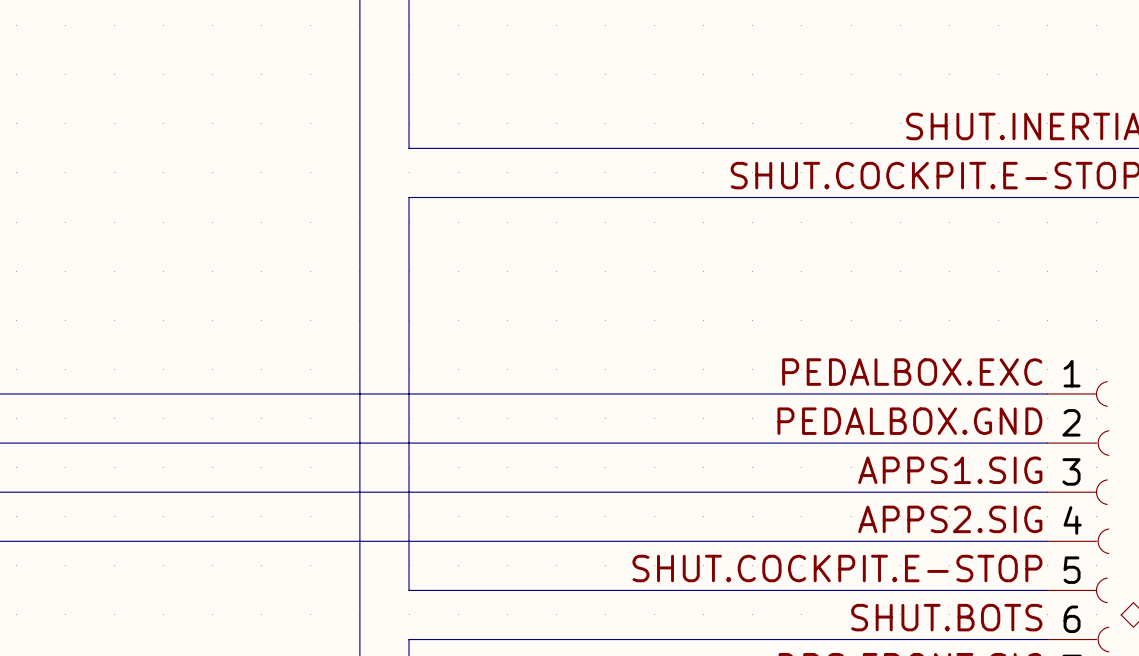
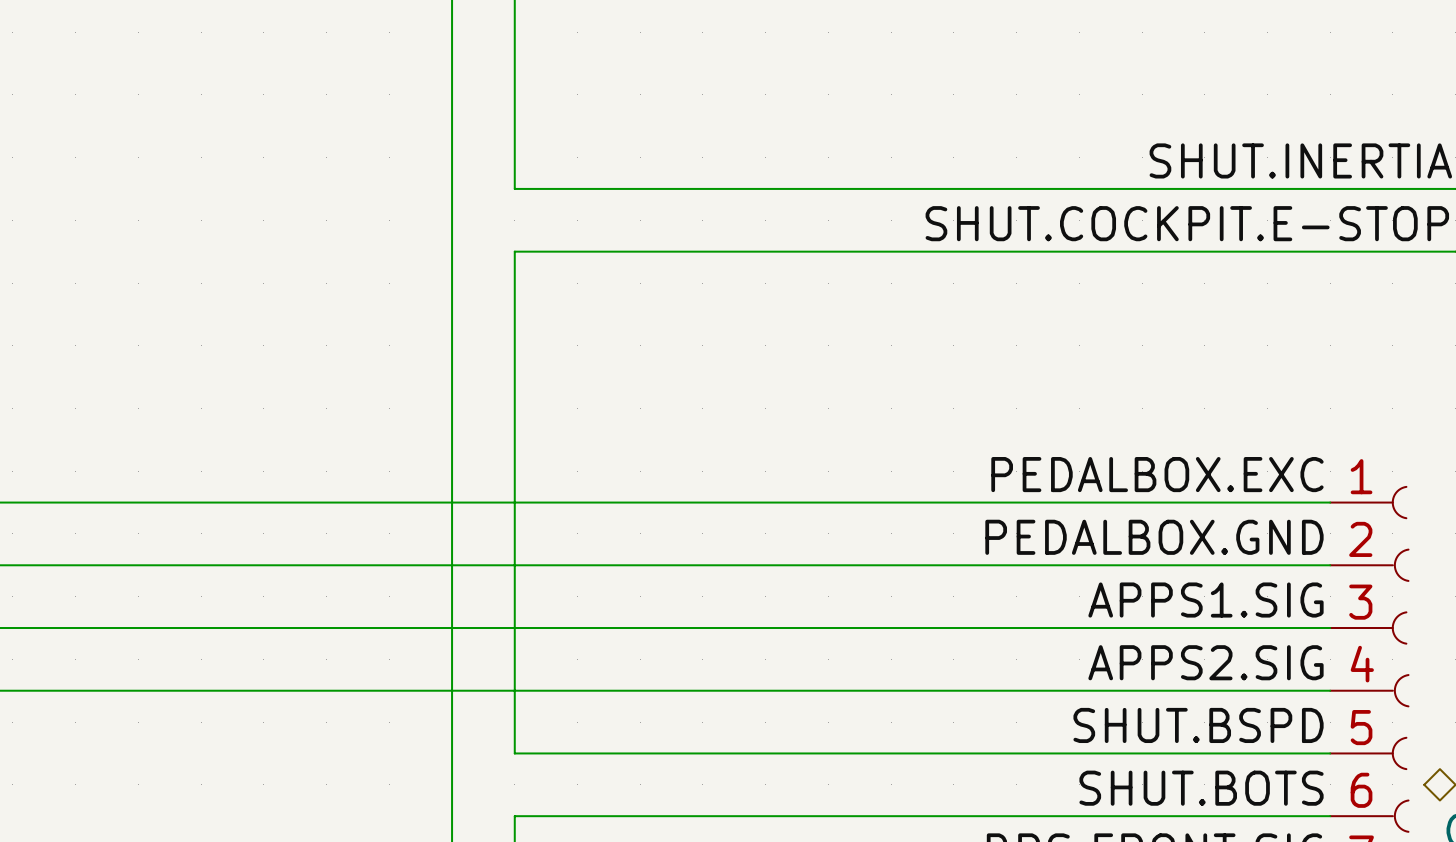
label: SHUT.COCKPIT.E-STOP (837, 568) -> SHUT.BSPD (1198, 725)

